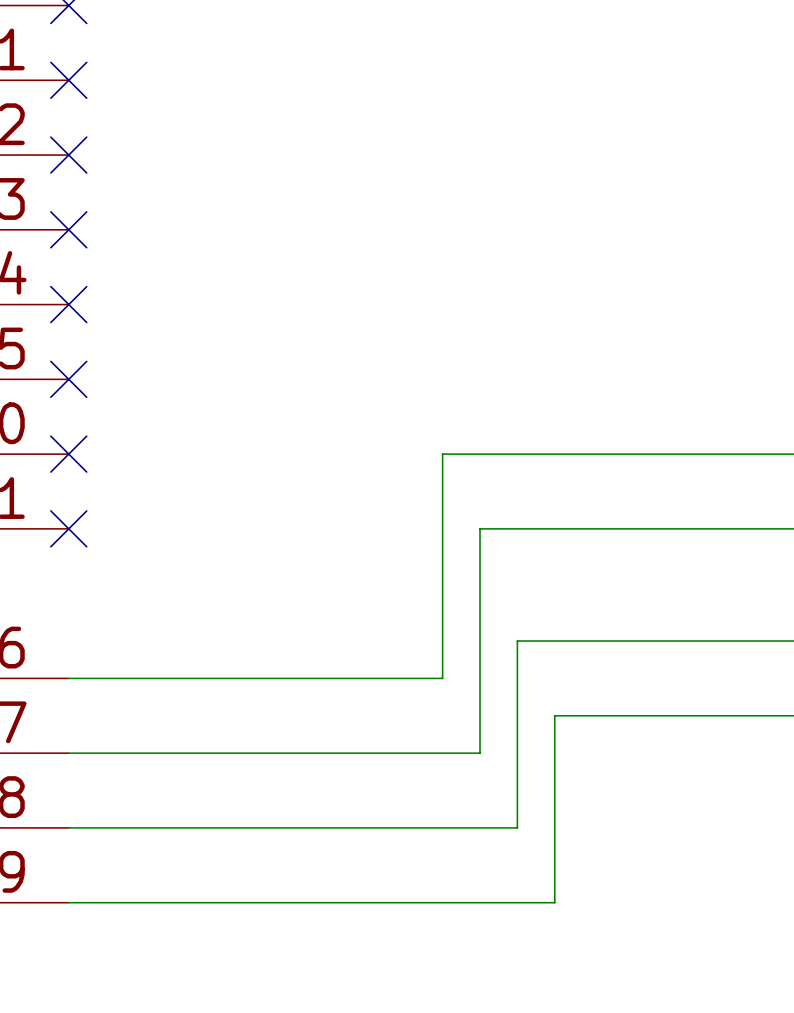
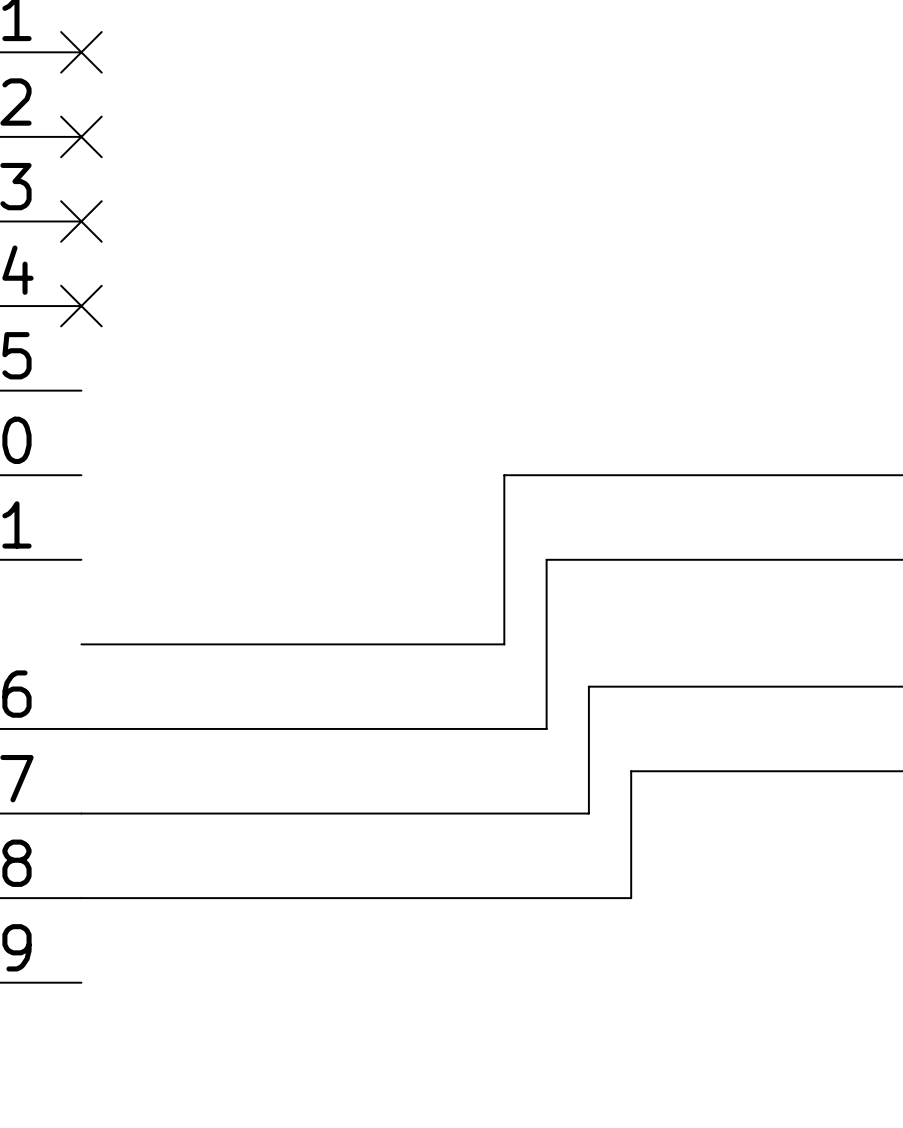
no-connect mark: (68, 379) -> none
no-connect mark: (68, 454) -> none
no-connect mark: (68, 528) -> none
wire: none -> (81, 644) (504, 644)
wire: (442, 603) (442, 678) -> (546, 728) (504, 728)
wire: (480, 678) (480, 753) -> (588, 813) (546, 813)
wire: (517, 753) (517, 827) -> (631, 898) (588, 898)
wire: (554, 827) (554, 902) (68, 902) -> none

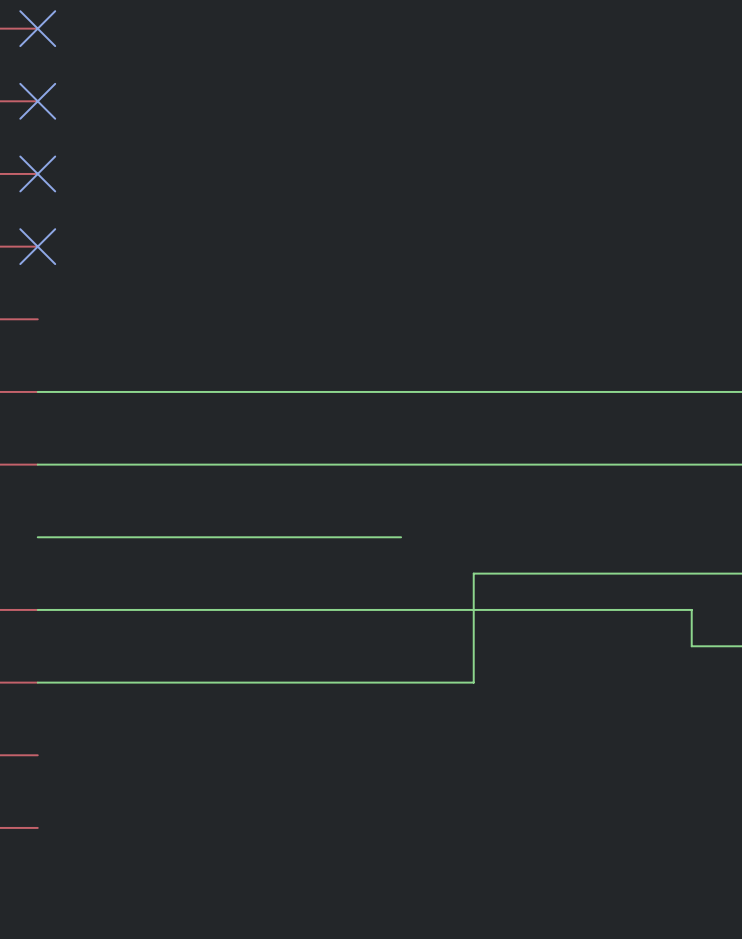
wire: (504, 475) (504, 644) -> (401, 391) (37, 391)
wire: none -> (37, 464) (437, 464)
wire: (546, 559) (546, 728) -> (691, 646) (691, 609) (437, 609)
wire: (842, 771) (631, 771) (631, 898) (81, 898) -> none

